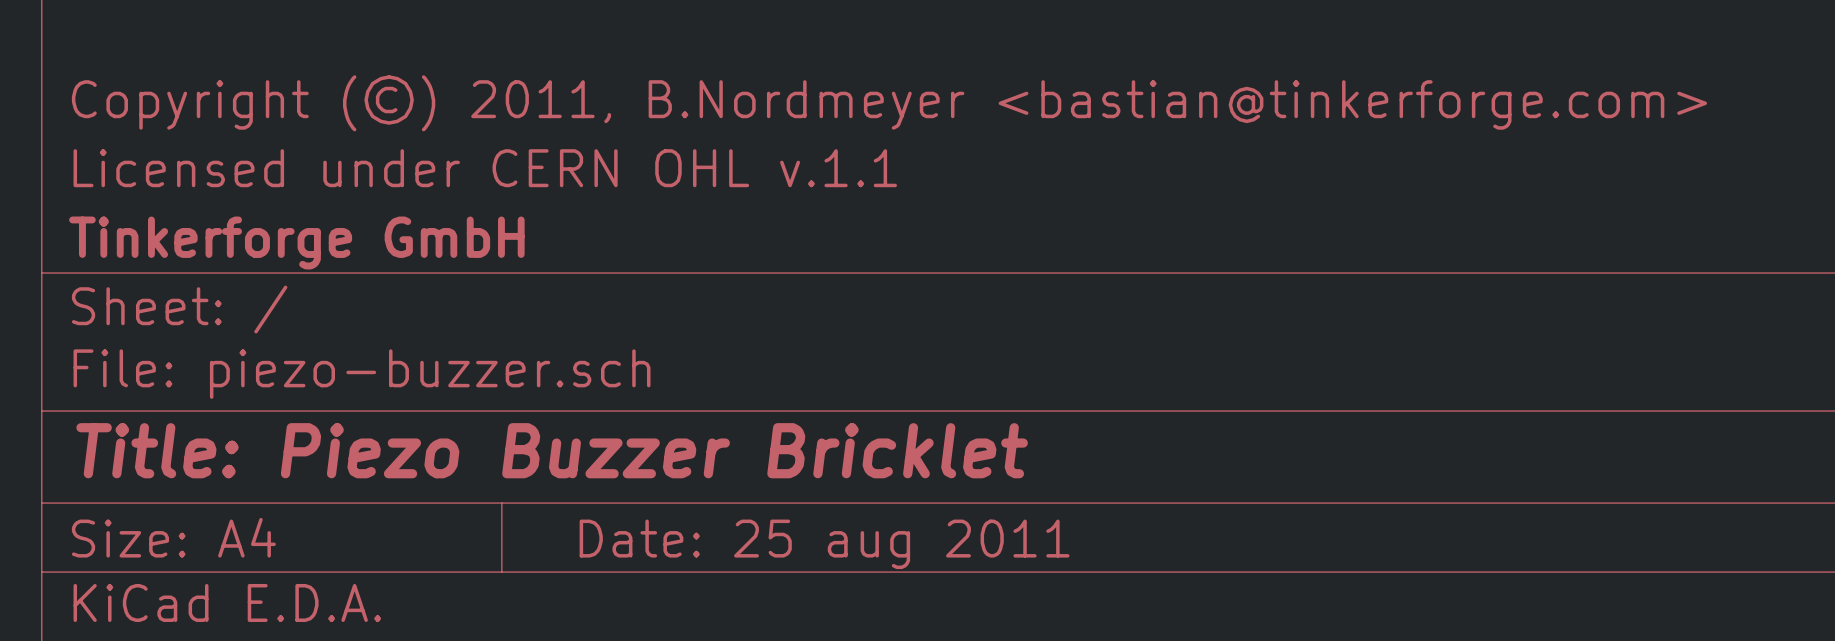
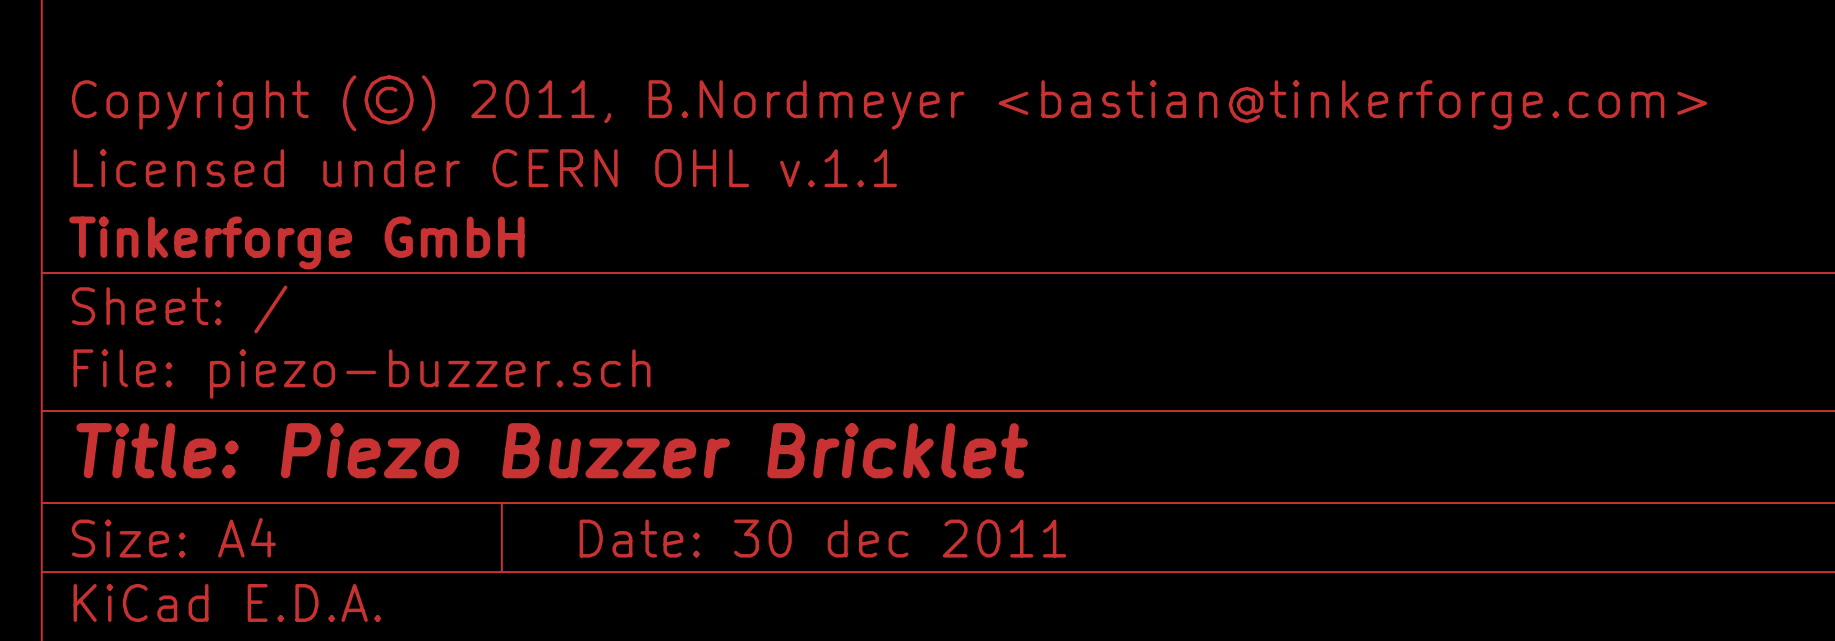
title block: Date: 25 aug 2011 (824, 544) -> Date: 30 dec 2011 (822, 538)

